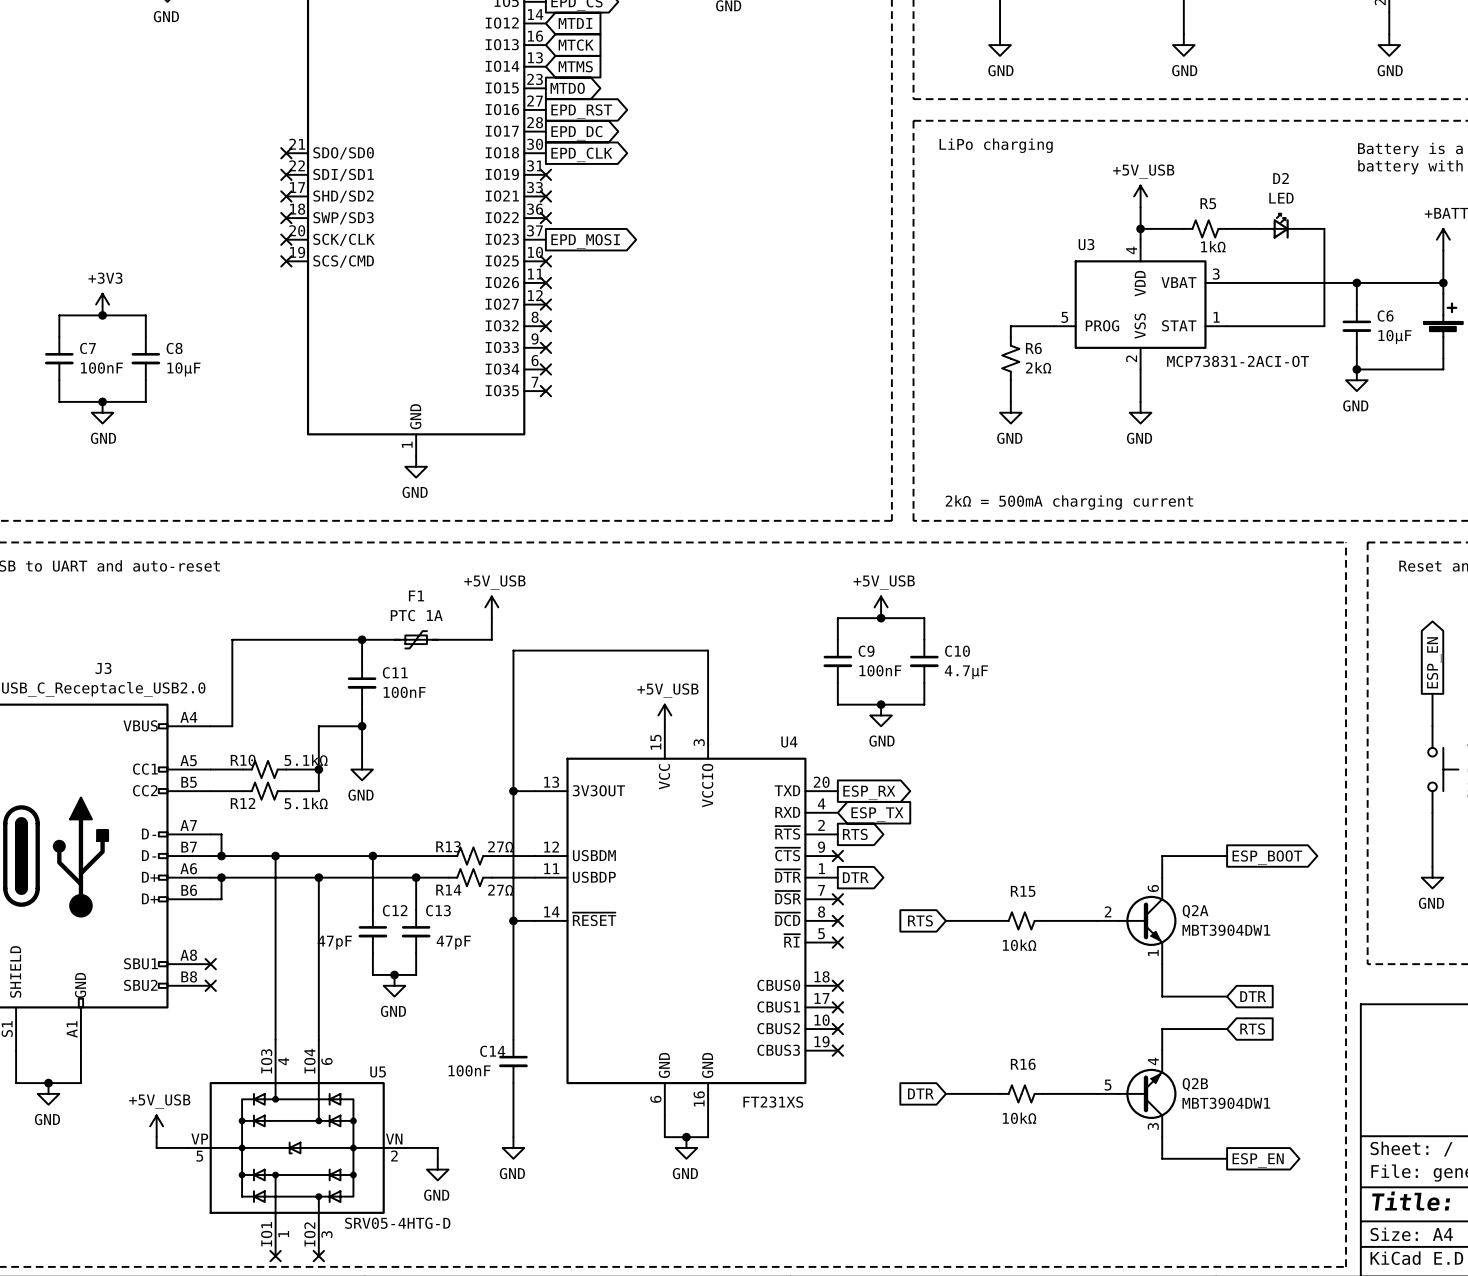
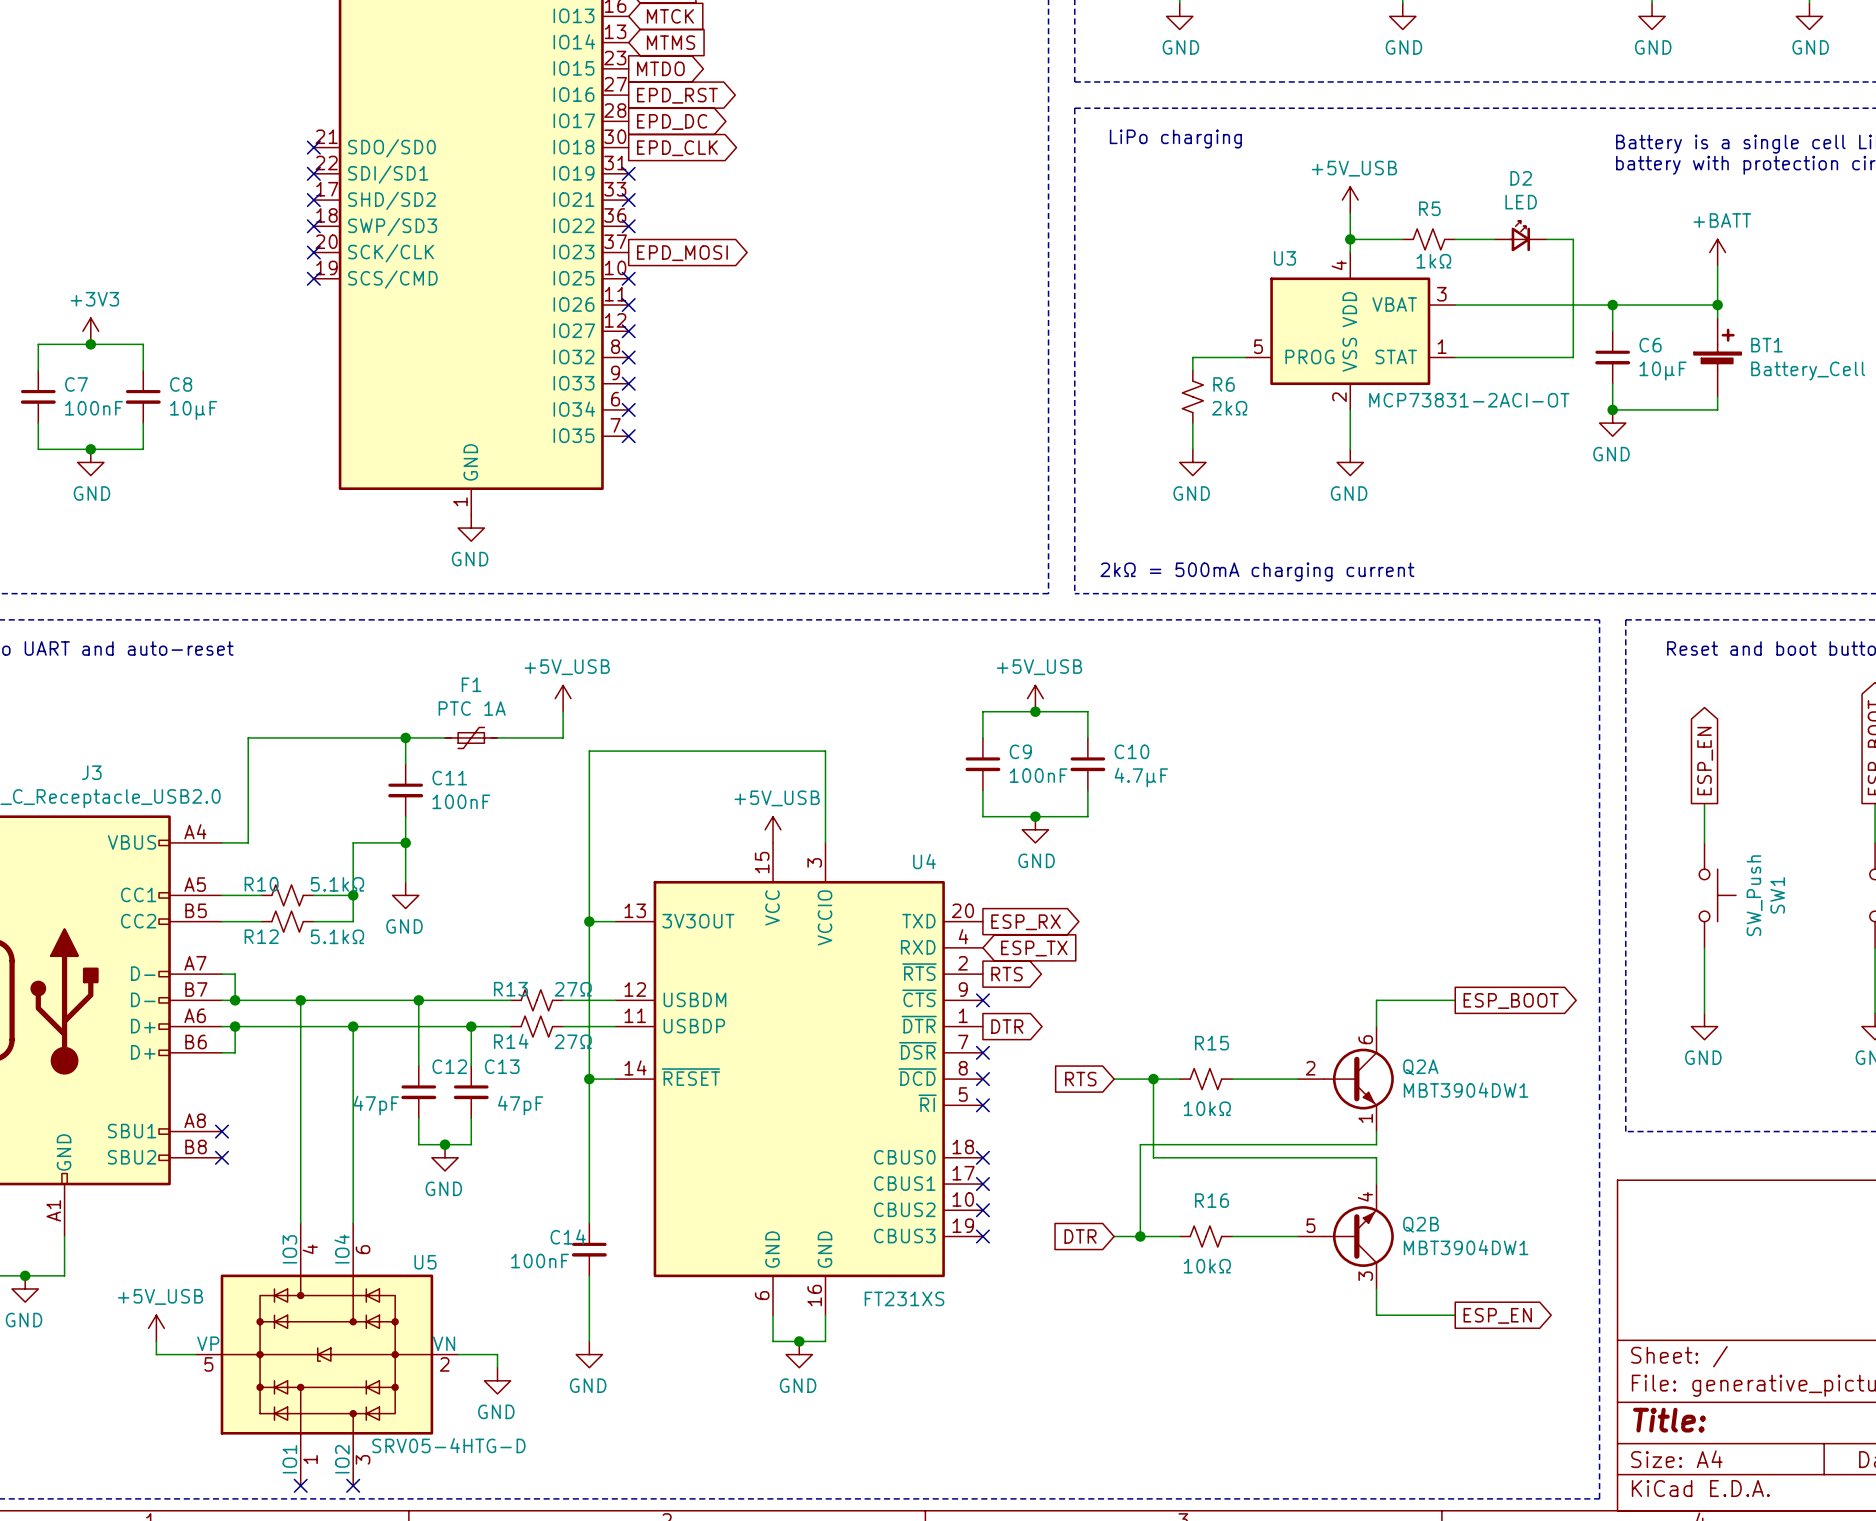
junction: none -> (1153, 1079)
wire: (1162, 974) (1162, 985) -> (1153, 1079) (1153, 1157) (1376, 1157)
wire: none -> (1376, 1144) (1140, 1144) (1140, 1236)
wire: (1162, 996) (1227, 996) -> (1376, 1170) (1376, 1184)
global label: DTR (1253, 996) -> none
wire: (1227, 1029) (1162, 1029) (1162, 1050) -> none
global label: RTS (1252, 1029) -> none
junction: none -> (1140, 1236)
global label position: DTR (920, 1093) -> DTR (1080, 1236)
wire: (945, 1093) (1000, 1093) -> (1114, 1236) (1179, 1236)
R16 position: (1021, 1093) -> (1205, 1236)
wire: (1043, 1093) (1097, 1093) -> (1232, 1236) (1297, 1236)
Q2B position: (1136, 1093) -> (1345, 1236)
wire: (1162, 1137) (1162, 1158) (1227, 1158) -> (1376, 1288) (1376, 1315) (1455, 1315)
global label position: ESP_EN (1258, 1160) -> ESP_EN (1497, 1315)

